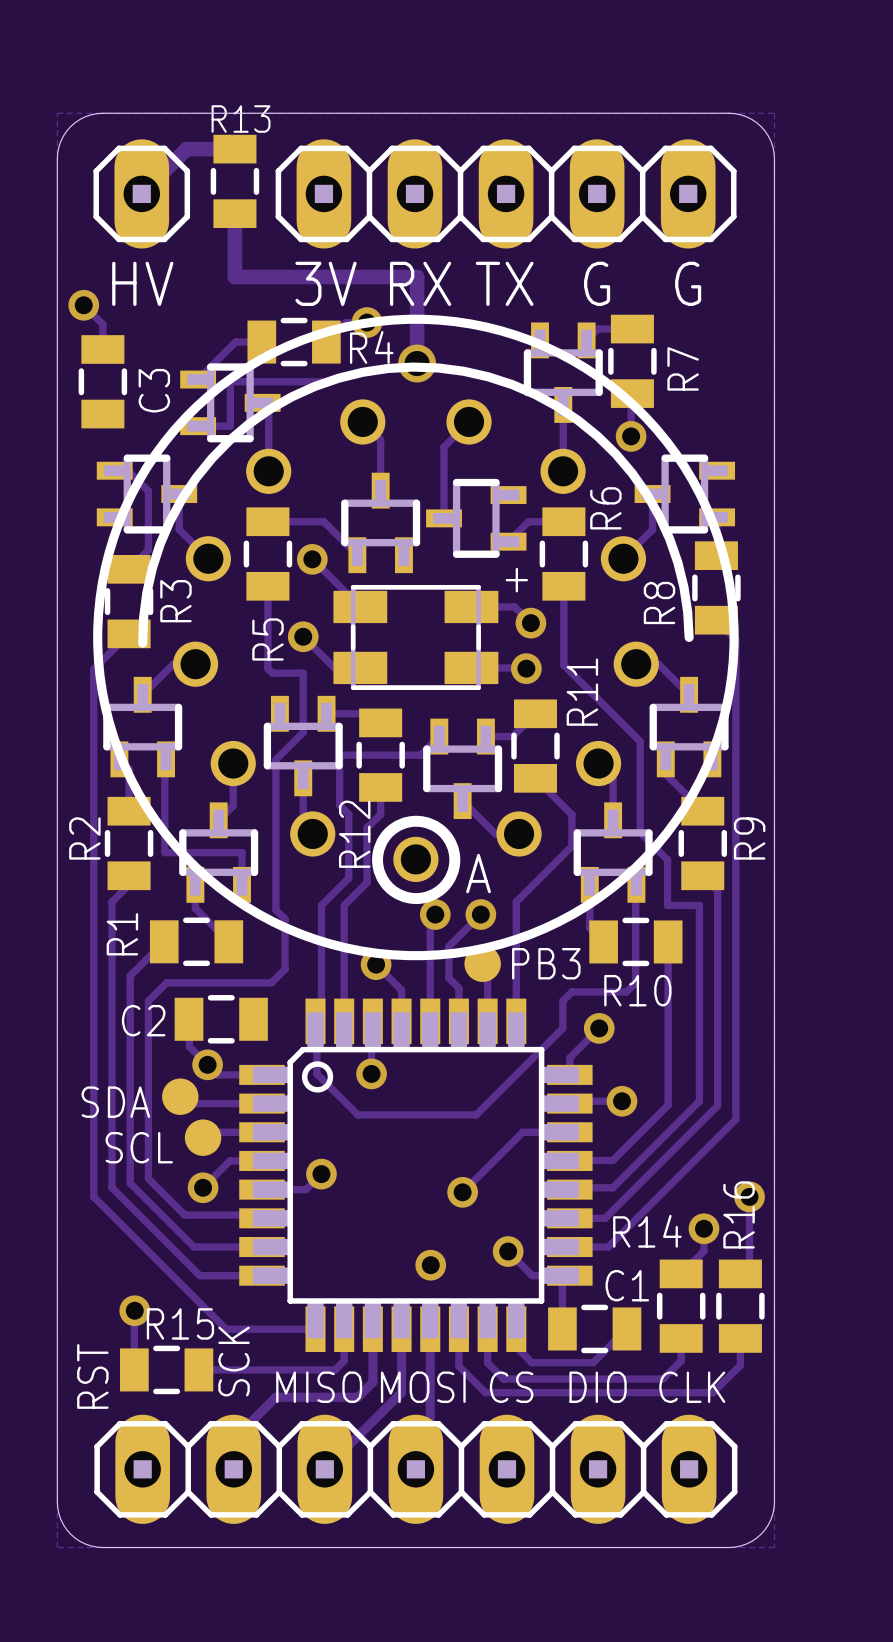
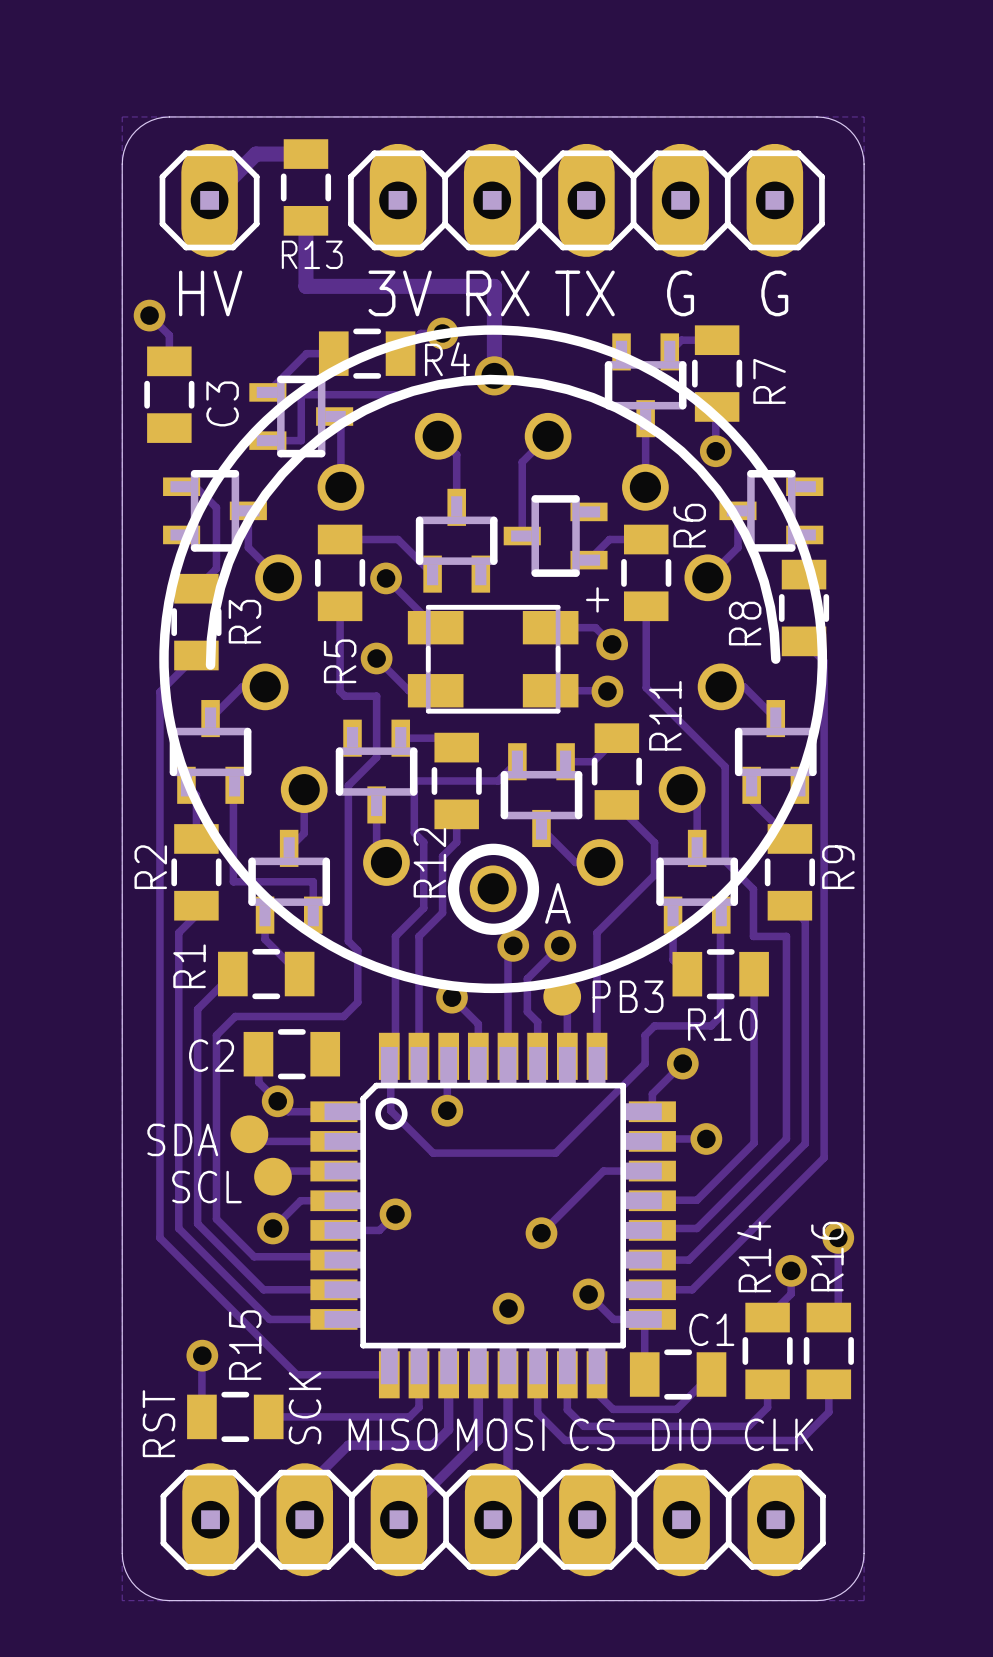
R13 name position: R13 (241, 119) -> R13 (312, 254)
R14 name rotation: 0° (647, 1231) -> 90° counterclockwise (754, 1256)
R15 name rotation: 0° (180, 1323) -> 90° counterclockwise (245, 1345)

